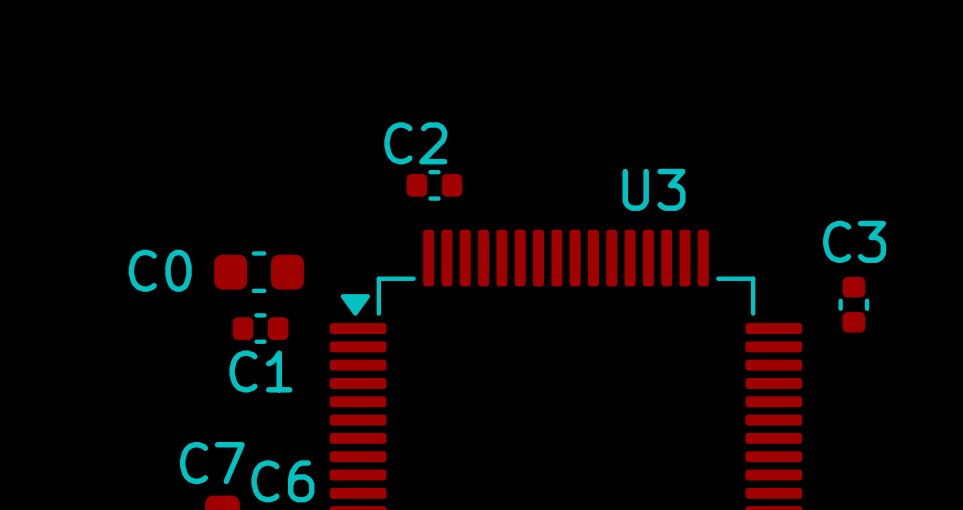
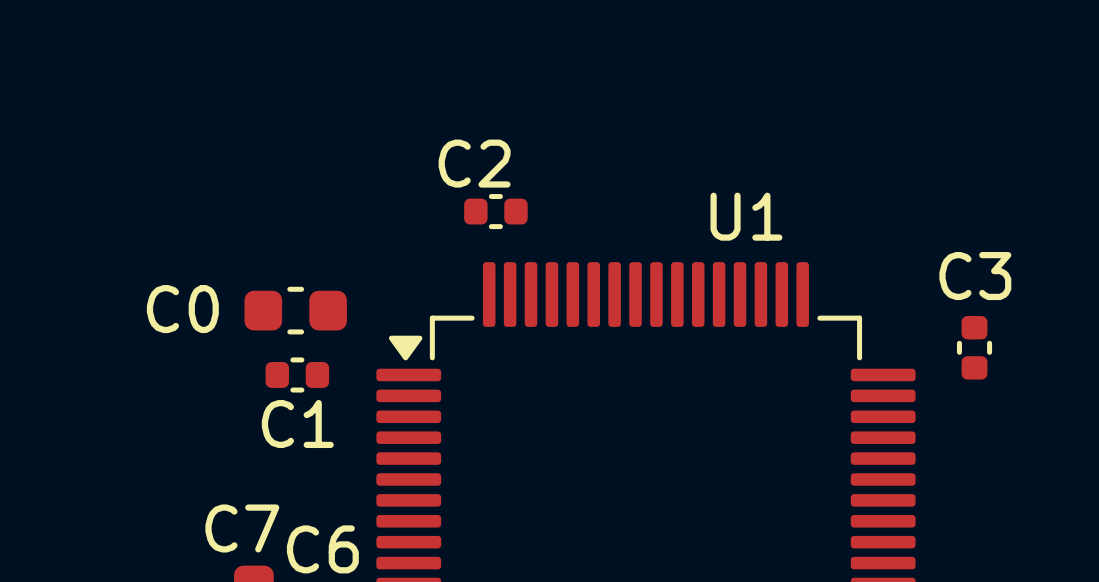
U3 name: U3 (654, 189) -> U1 (746, 216)

